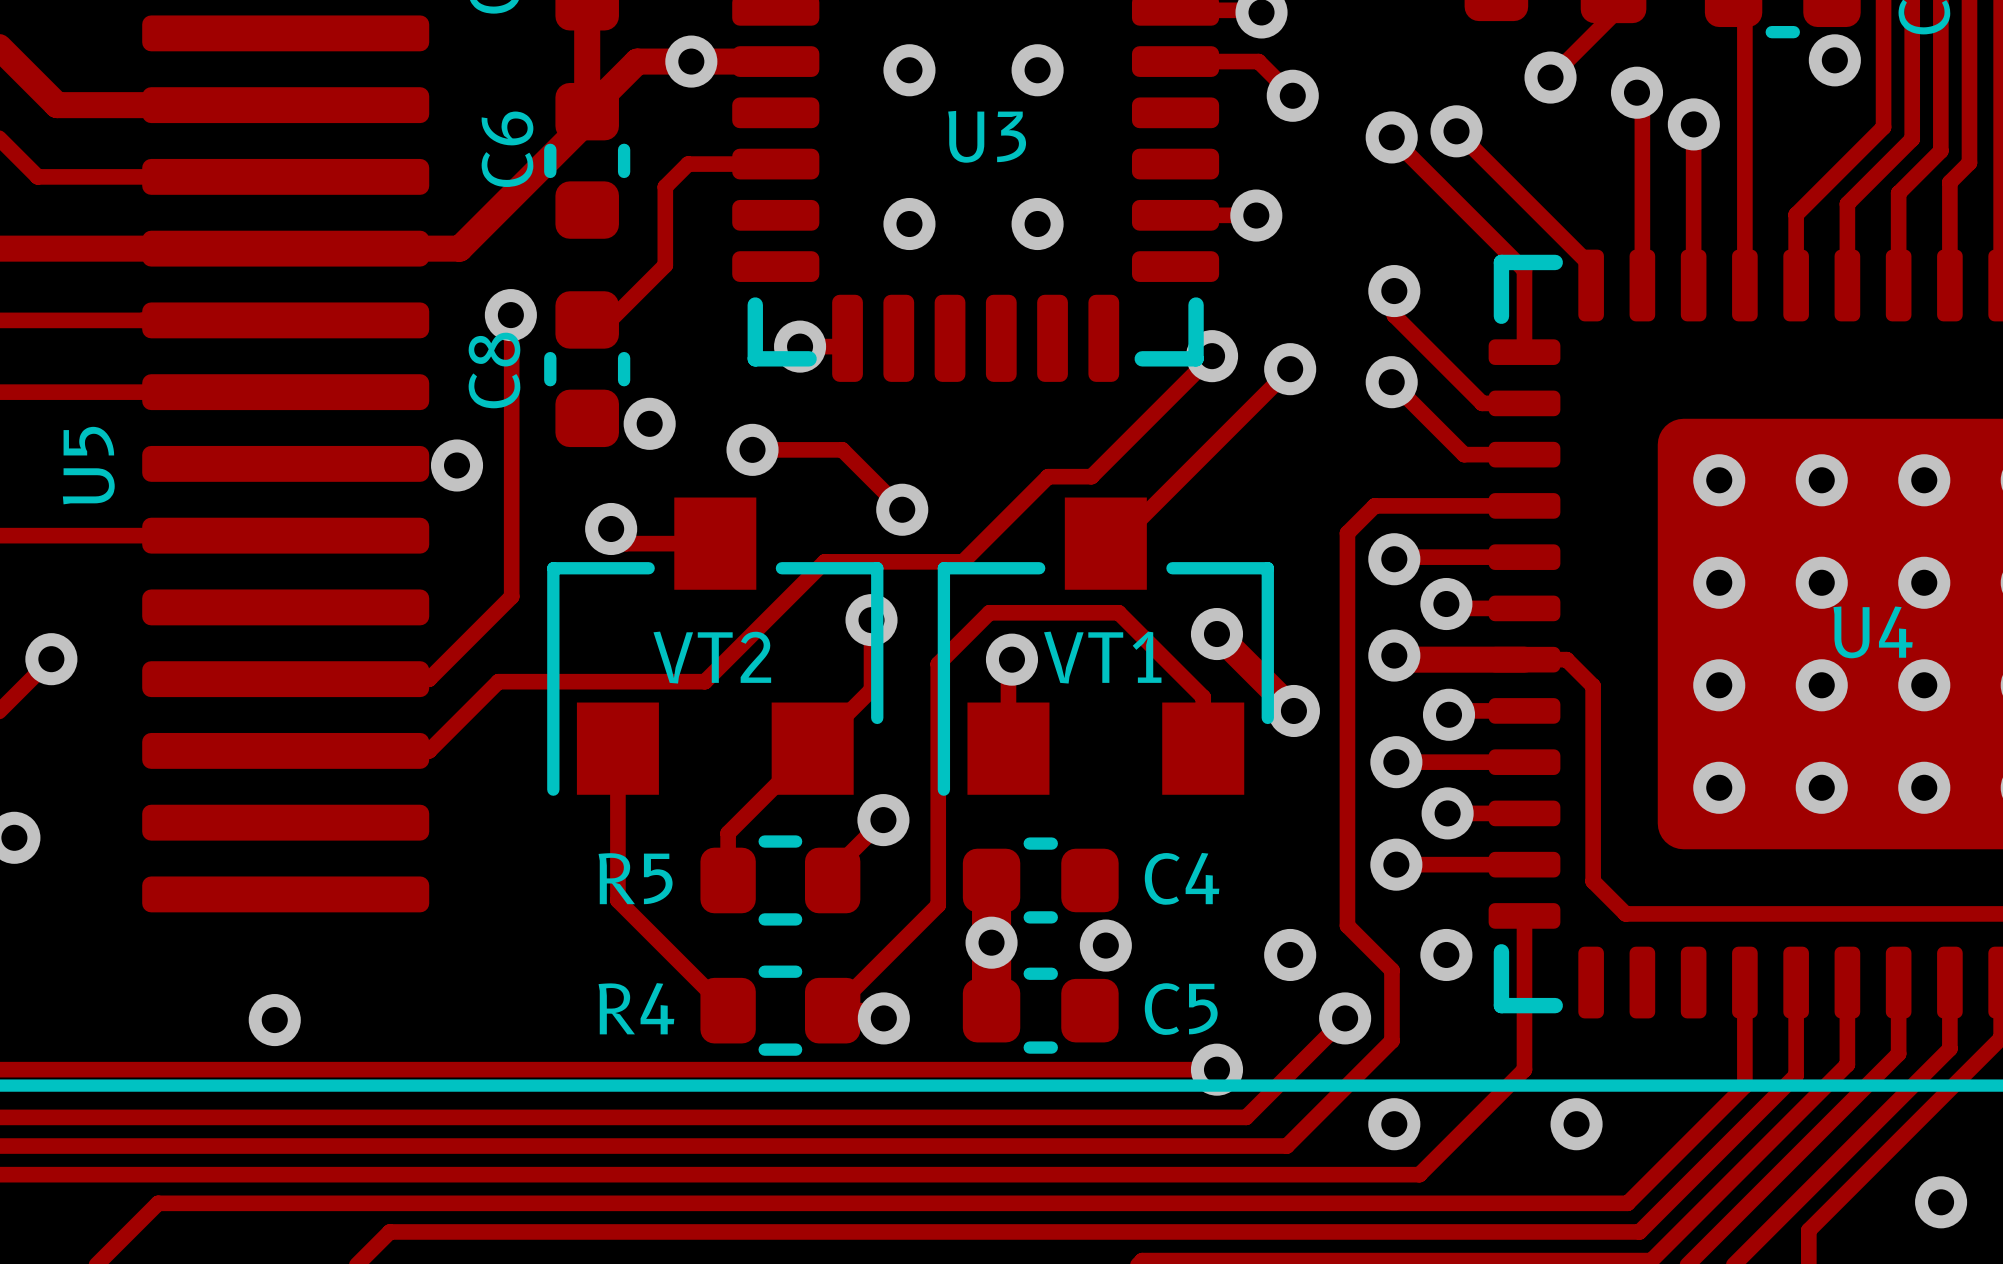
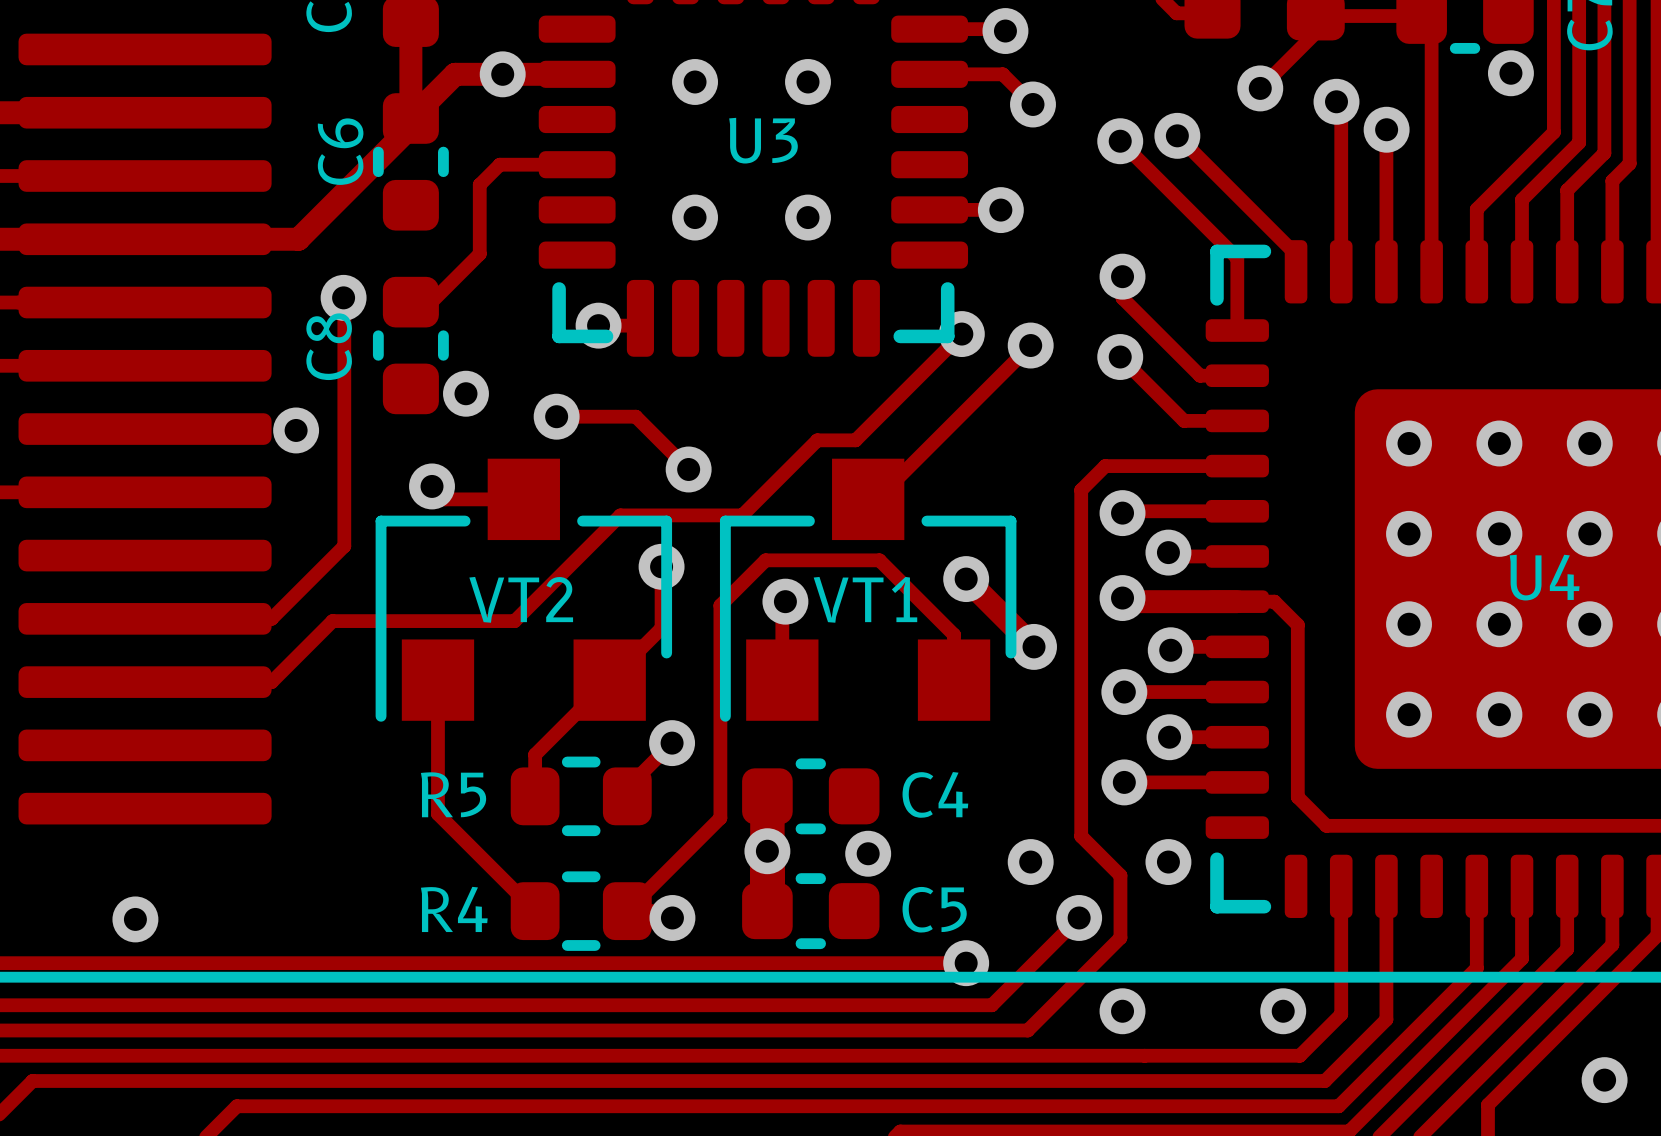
track: (1524, 915) (1524, 1069) (1419, 1174) -> (1341, 886) (1341, 1014) (1299, 1055) (1144, 1055)
track: (1744, 982) (1744, 1086) (1627, 1203) (1623, 1203) -> (1386, 886) (1386, 1019) (1325, 1081)

